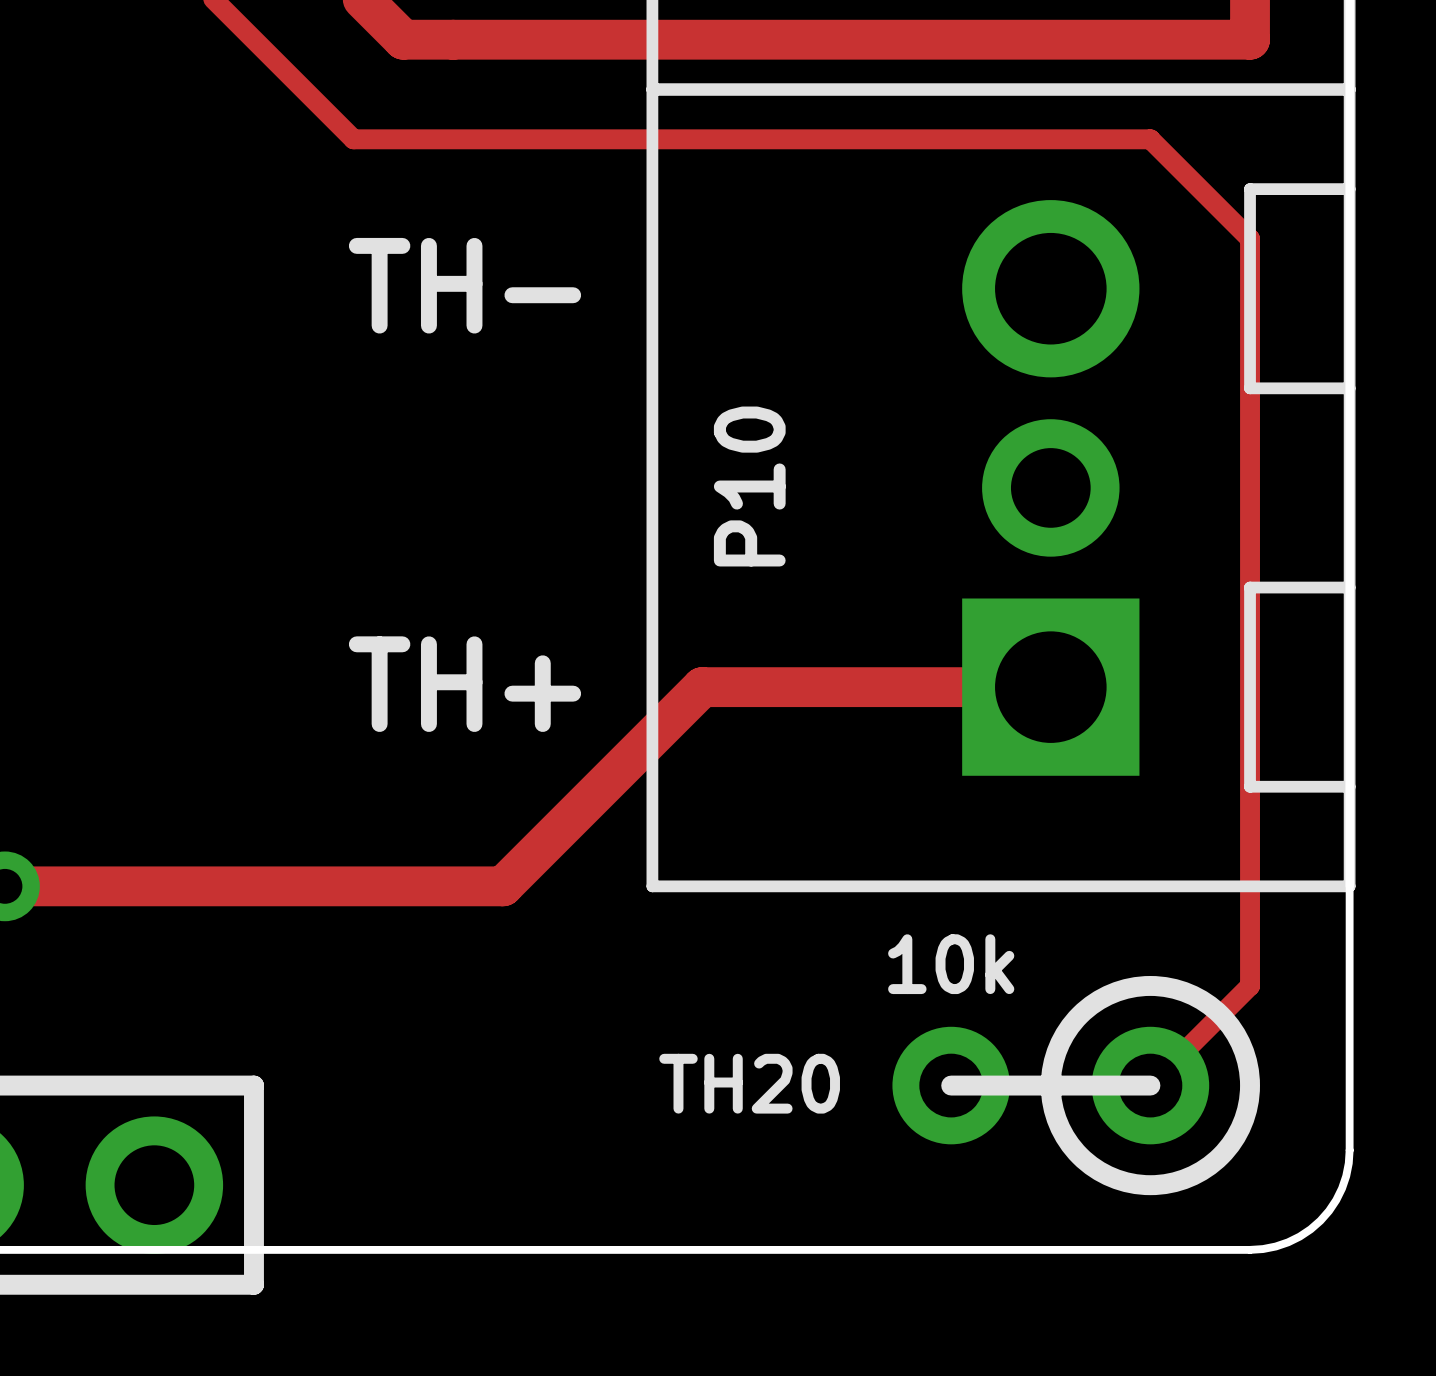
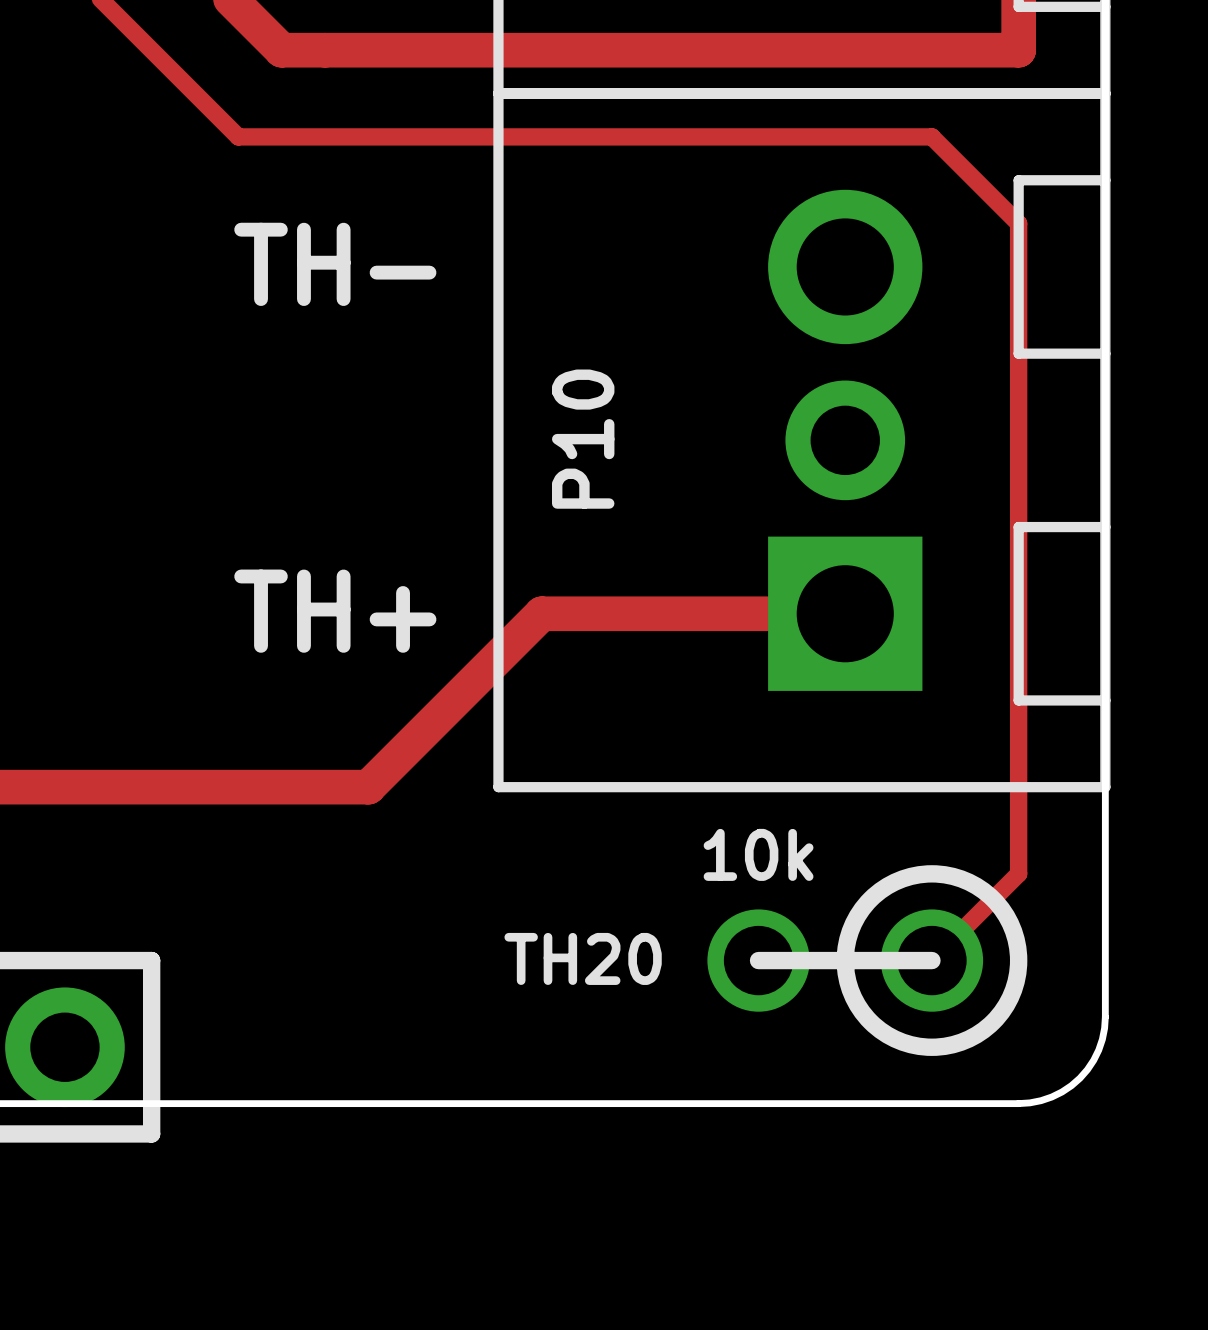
TH20 footprint: [892, 975, 1260, 1196] -> [707, 865, 1028, 1056]

